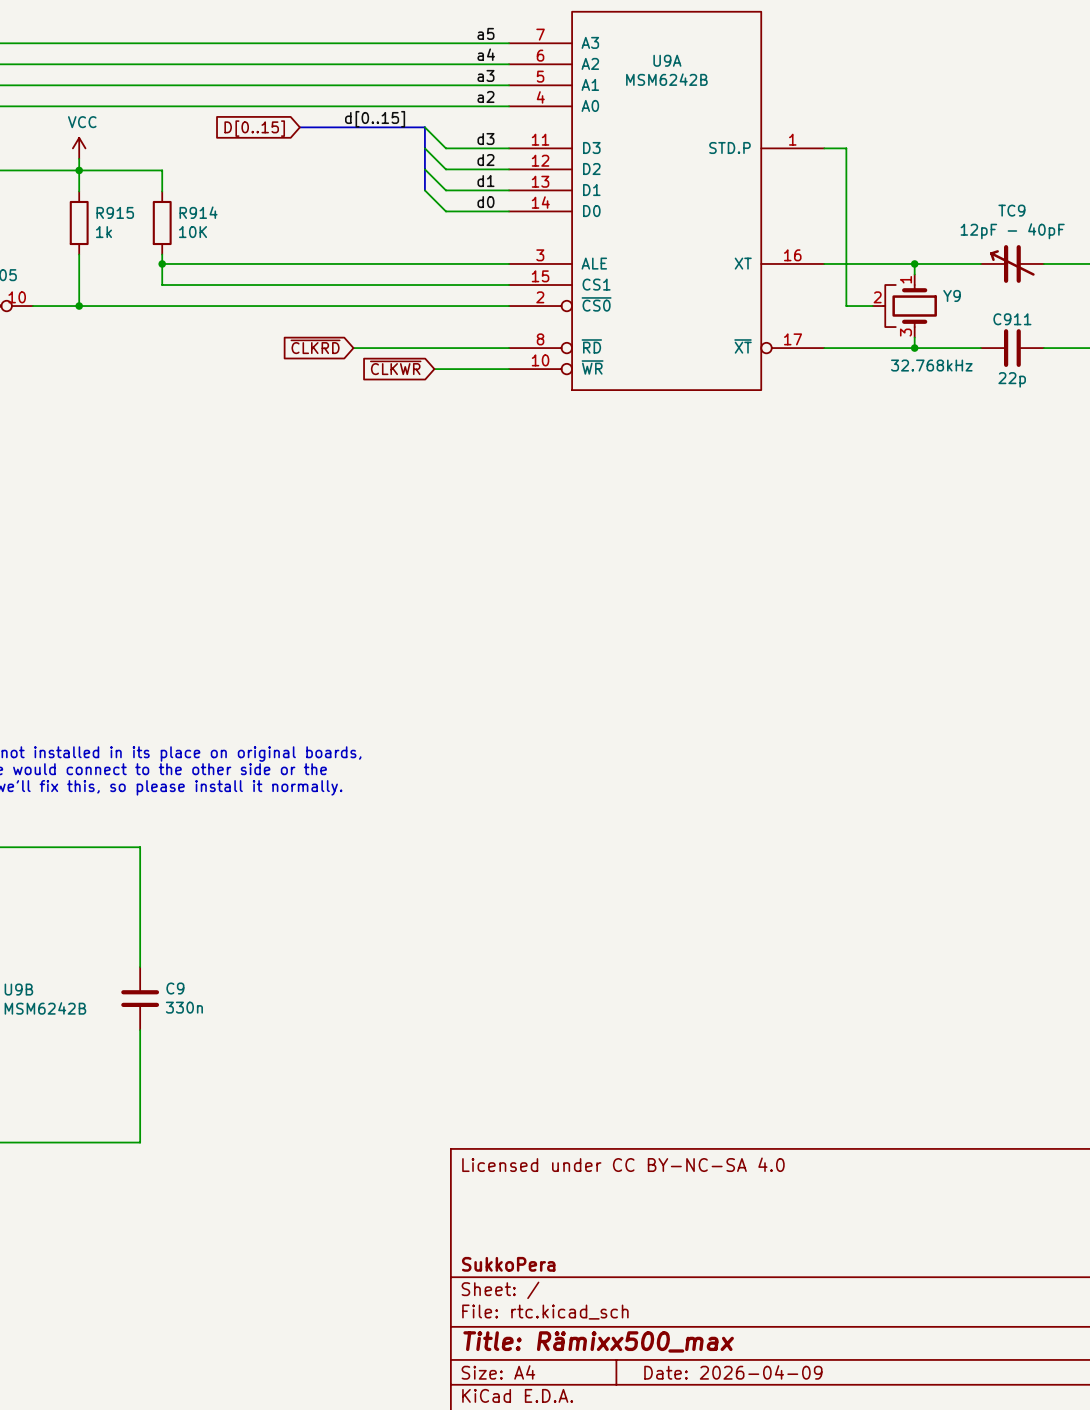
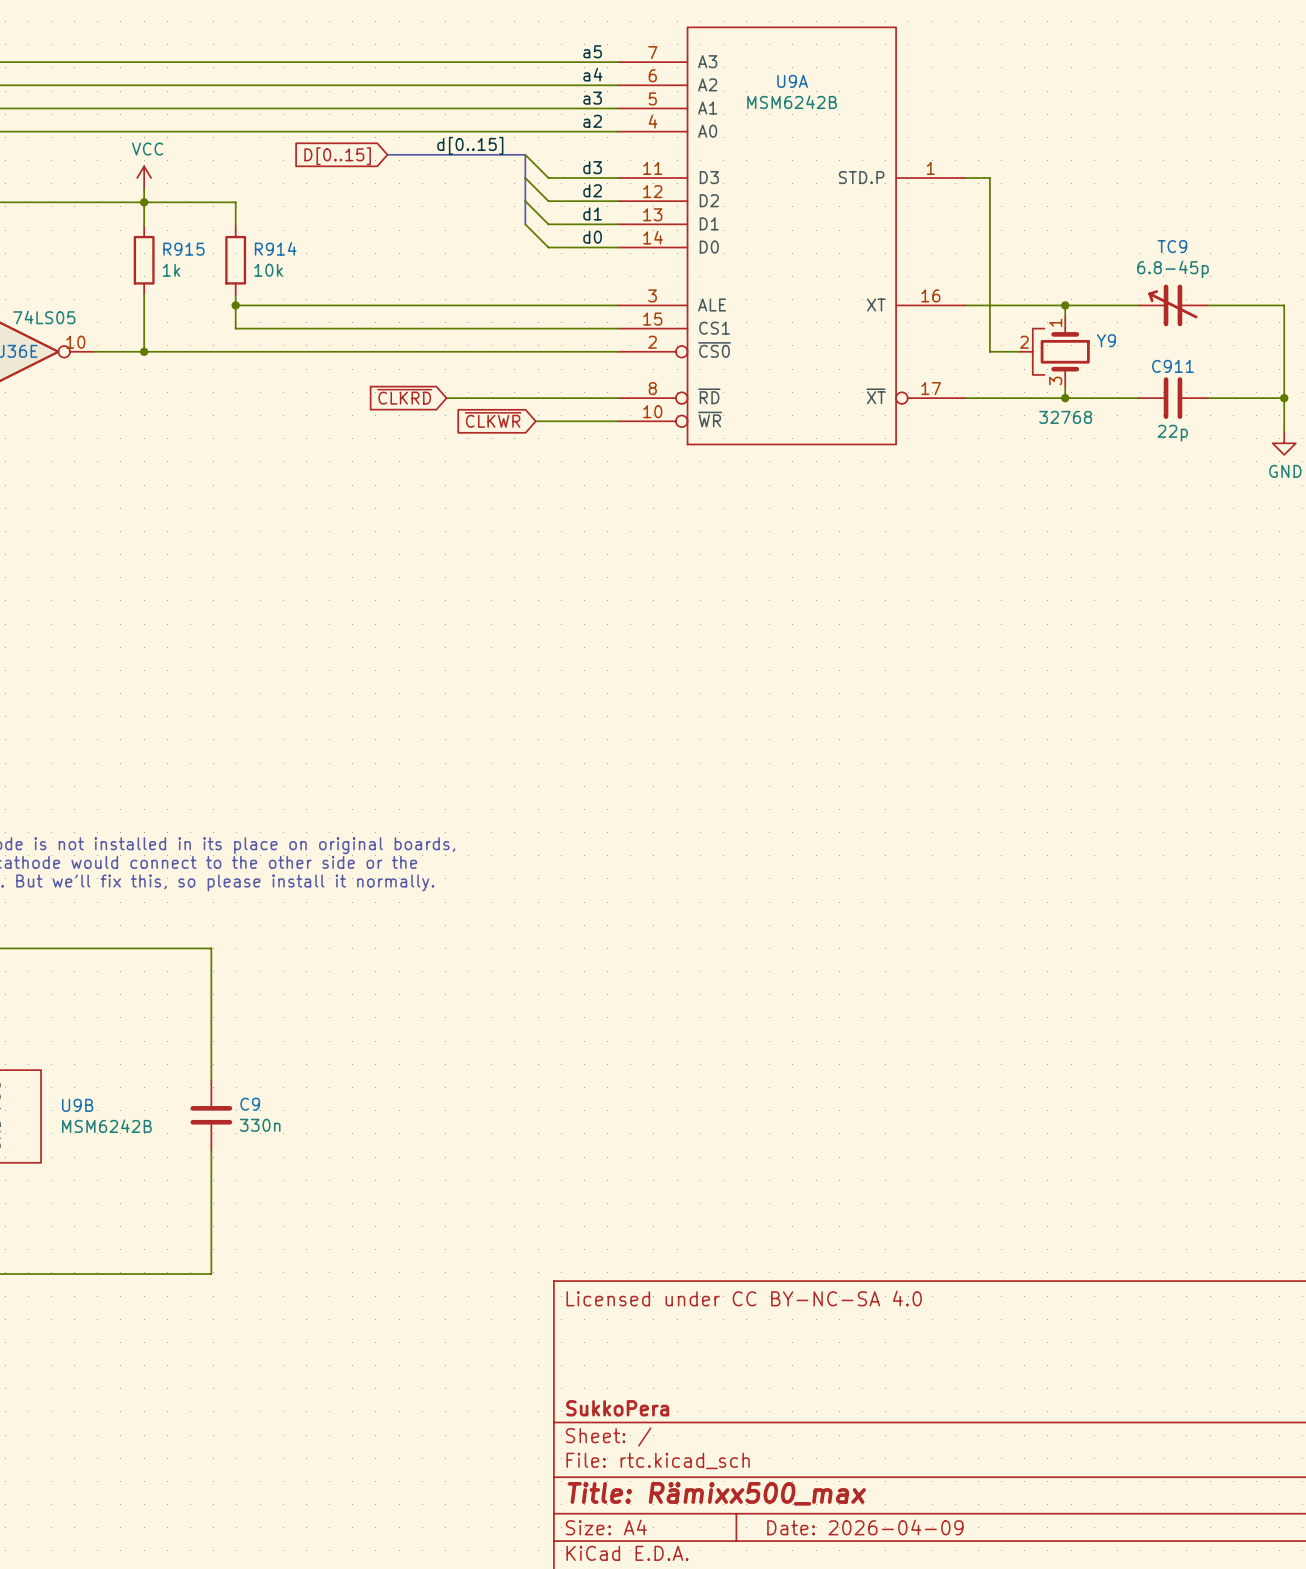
TC9 value: 12pF - 40pF (1012, 231) -> 6.8-45p (1172, 269)
R914 value: 10K (193, 232) -> 10k (268, 270)
Y9 value: 32.768kHz (931, 365) -> 32768 (1065, 417)

